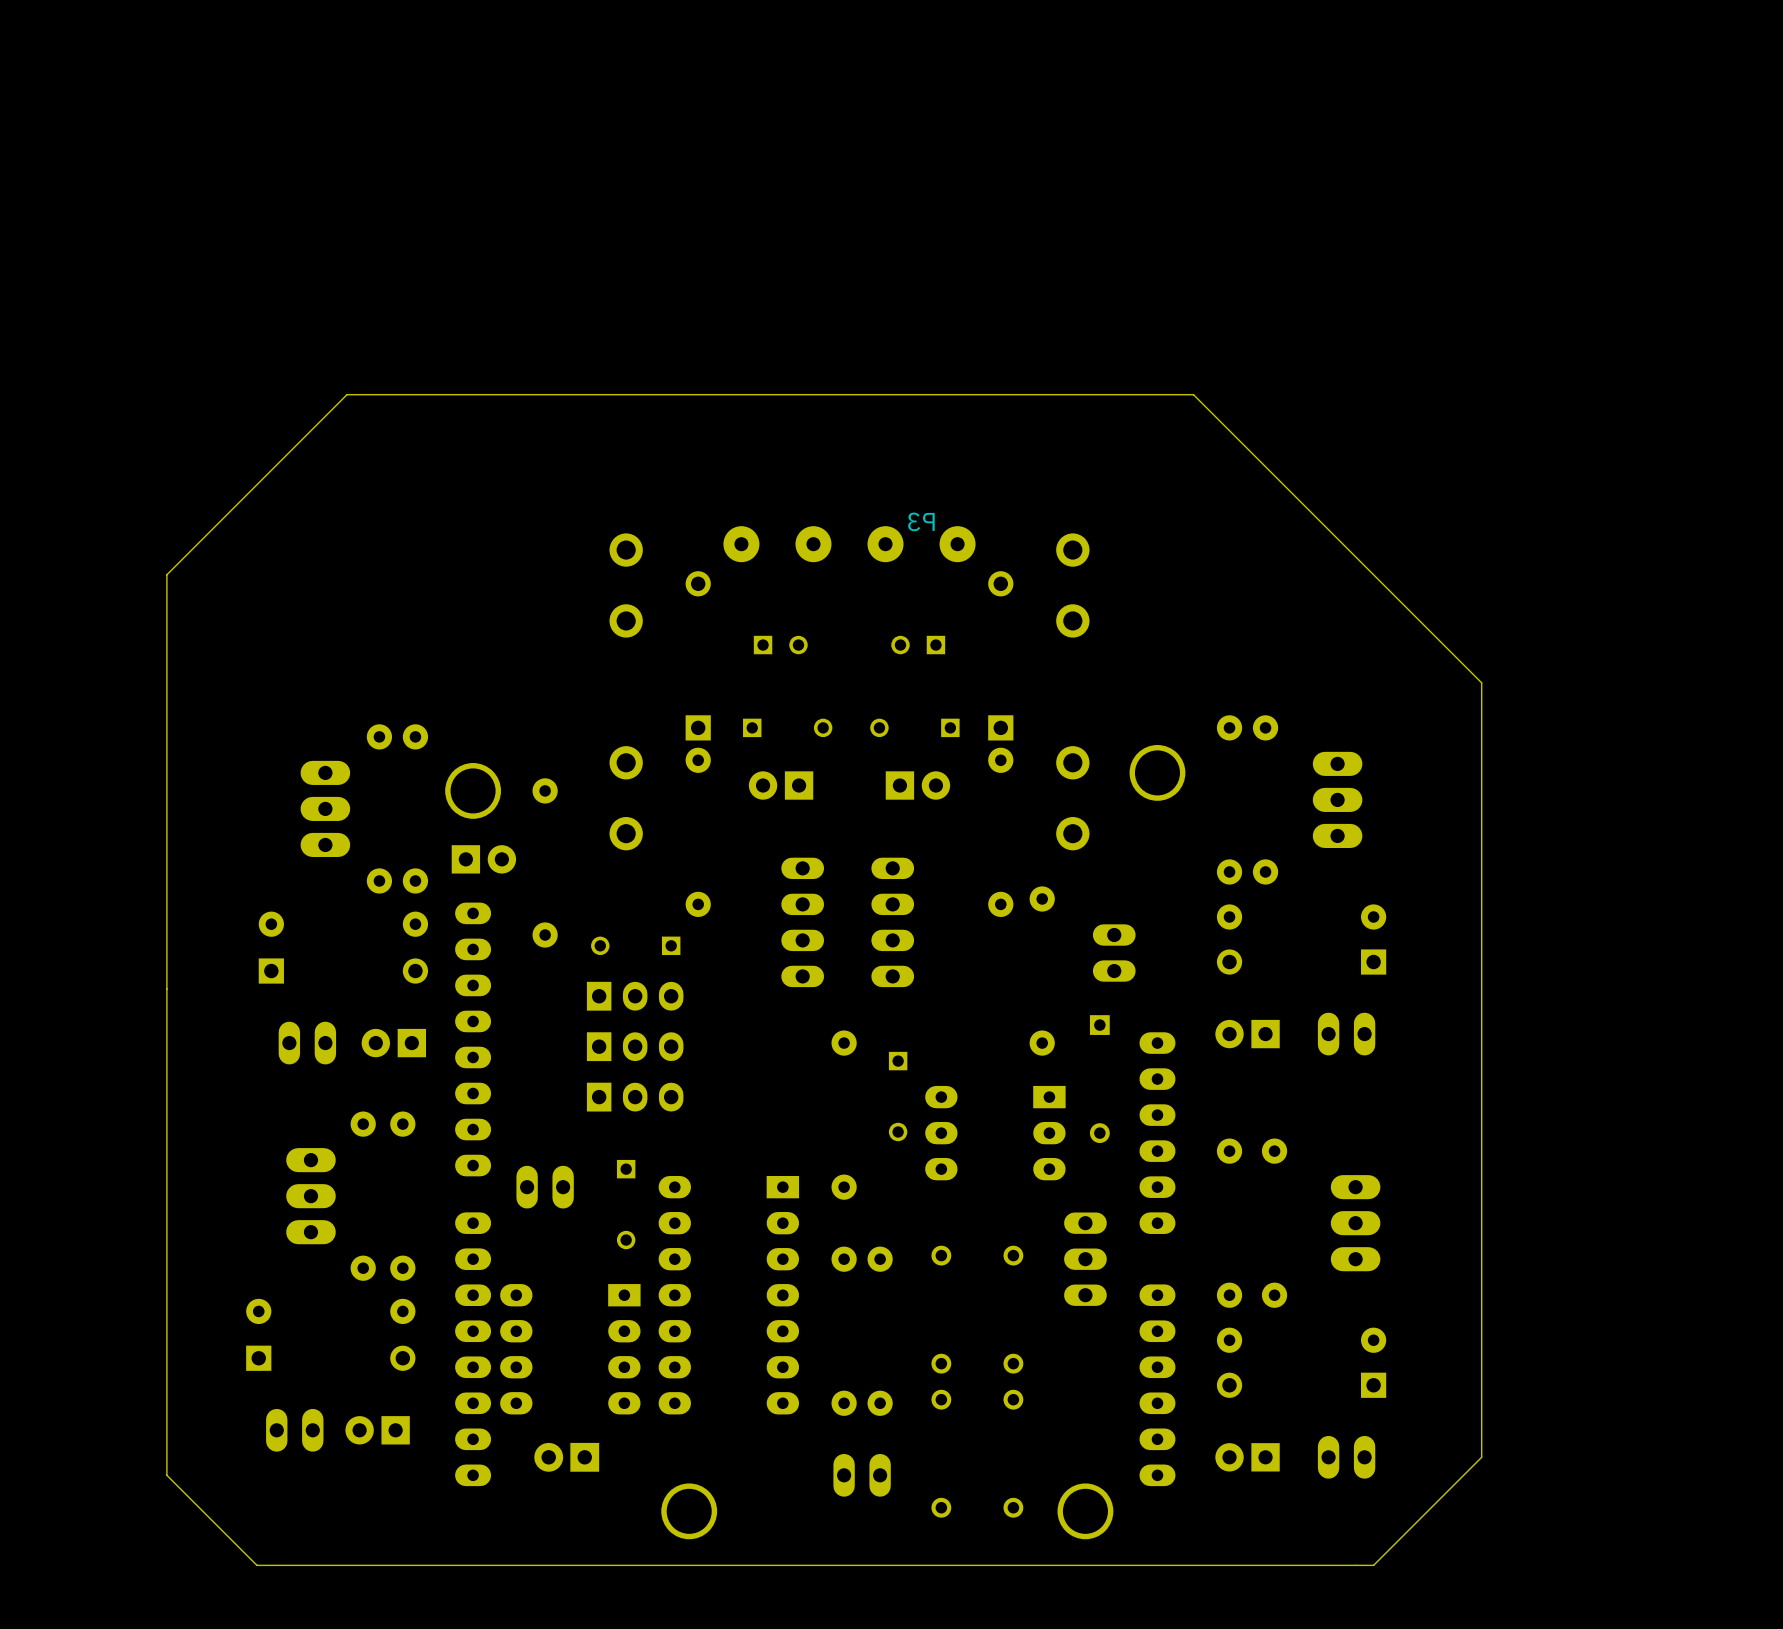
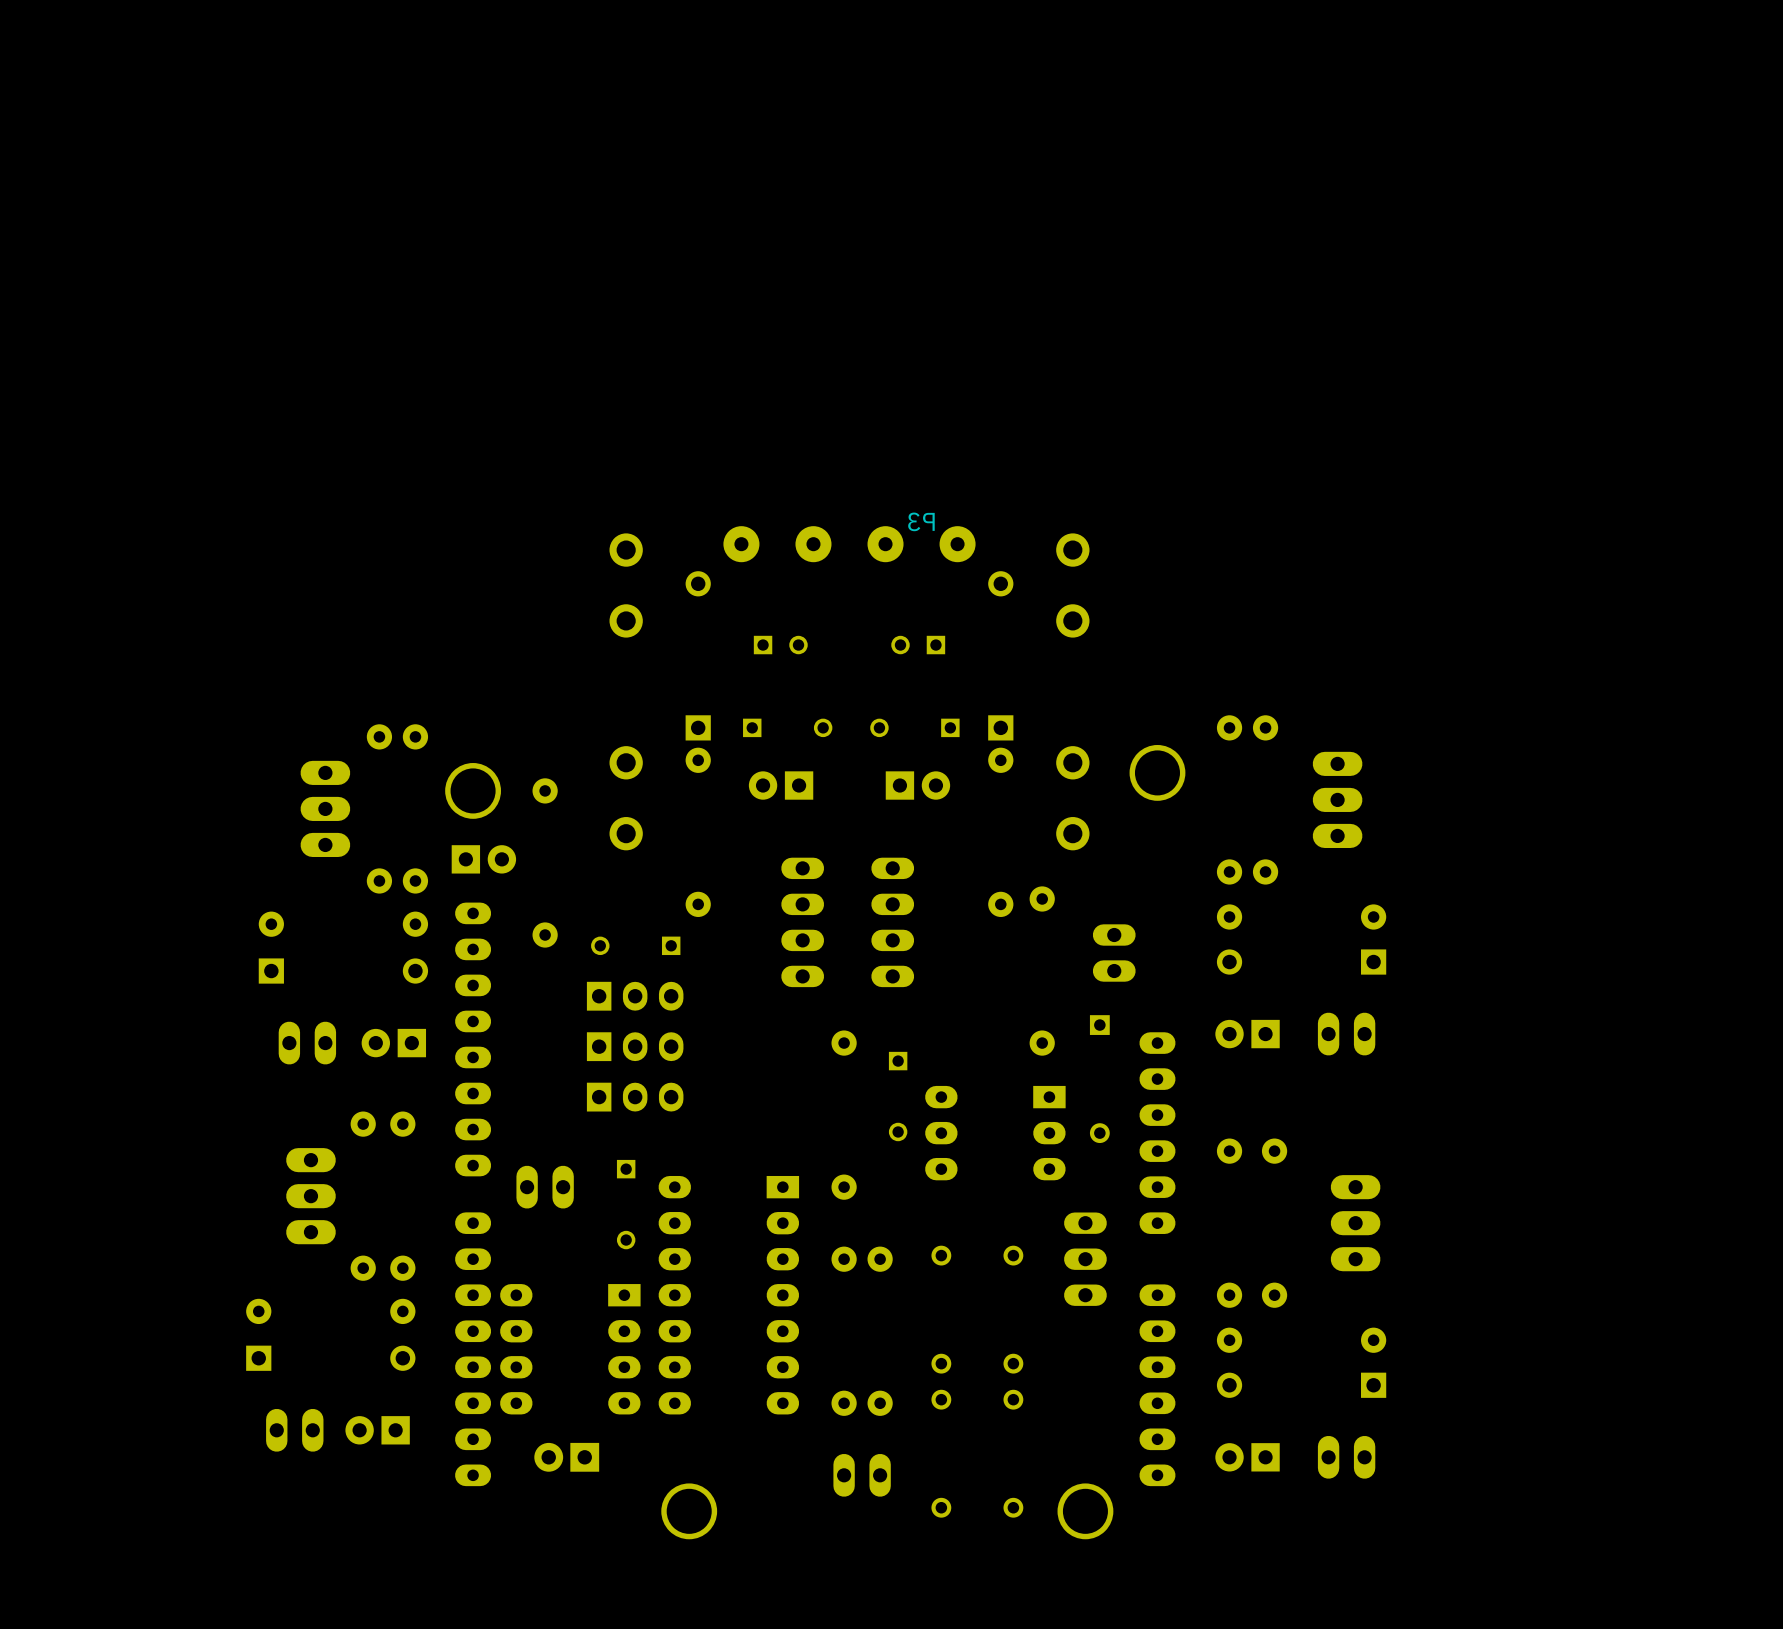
board edge: (1193, 394) (347, 394) (166, 574) (166, 1475) (256, 1565) (1373, 1565) (1481, 1457) (1481, 682) (1193, 394) -> none

